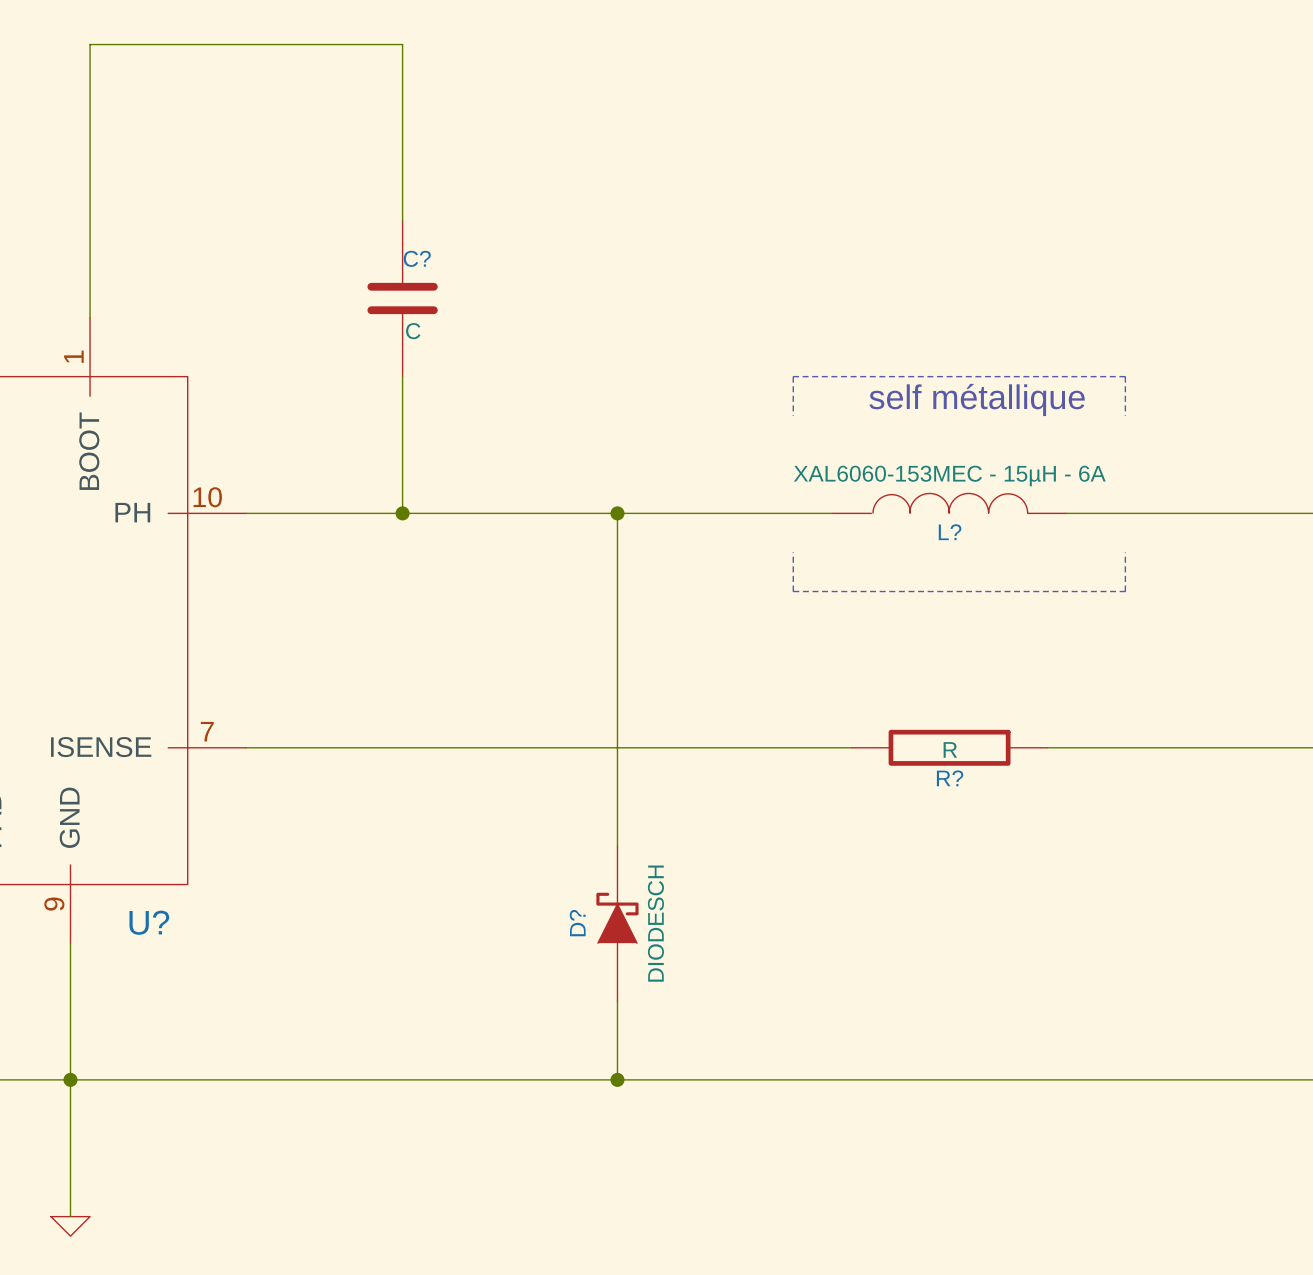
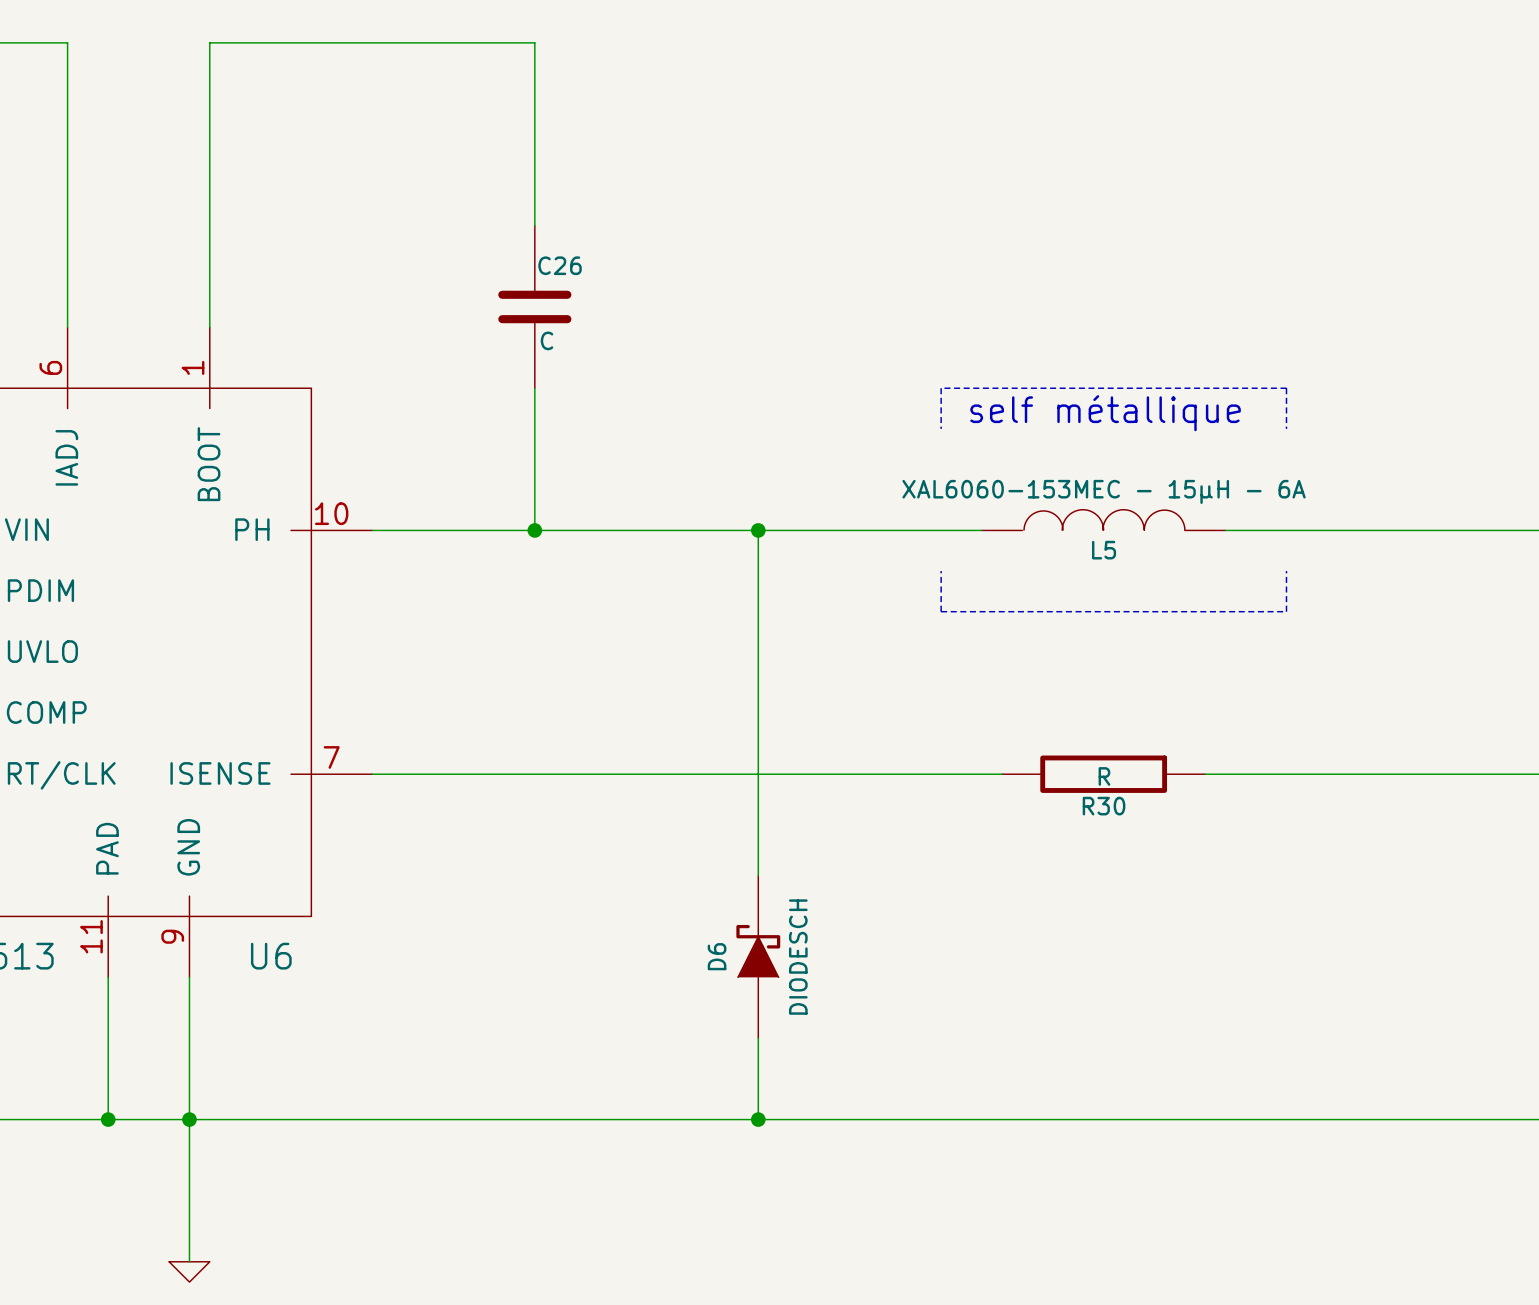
C? name: C? (417, 258) -> C26 (560, 265)
L? name: L? (950, 532) -> L5 (1104, 550)
R? name: R? (950, 778) -> R30 (1104, 806)
U? name: U? (149, 922) -> U6 (271, 956)
D? name: D? (577, 923) -> D6 (717, 956)

